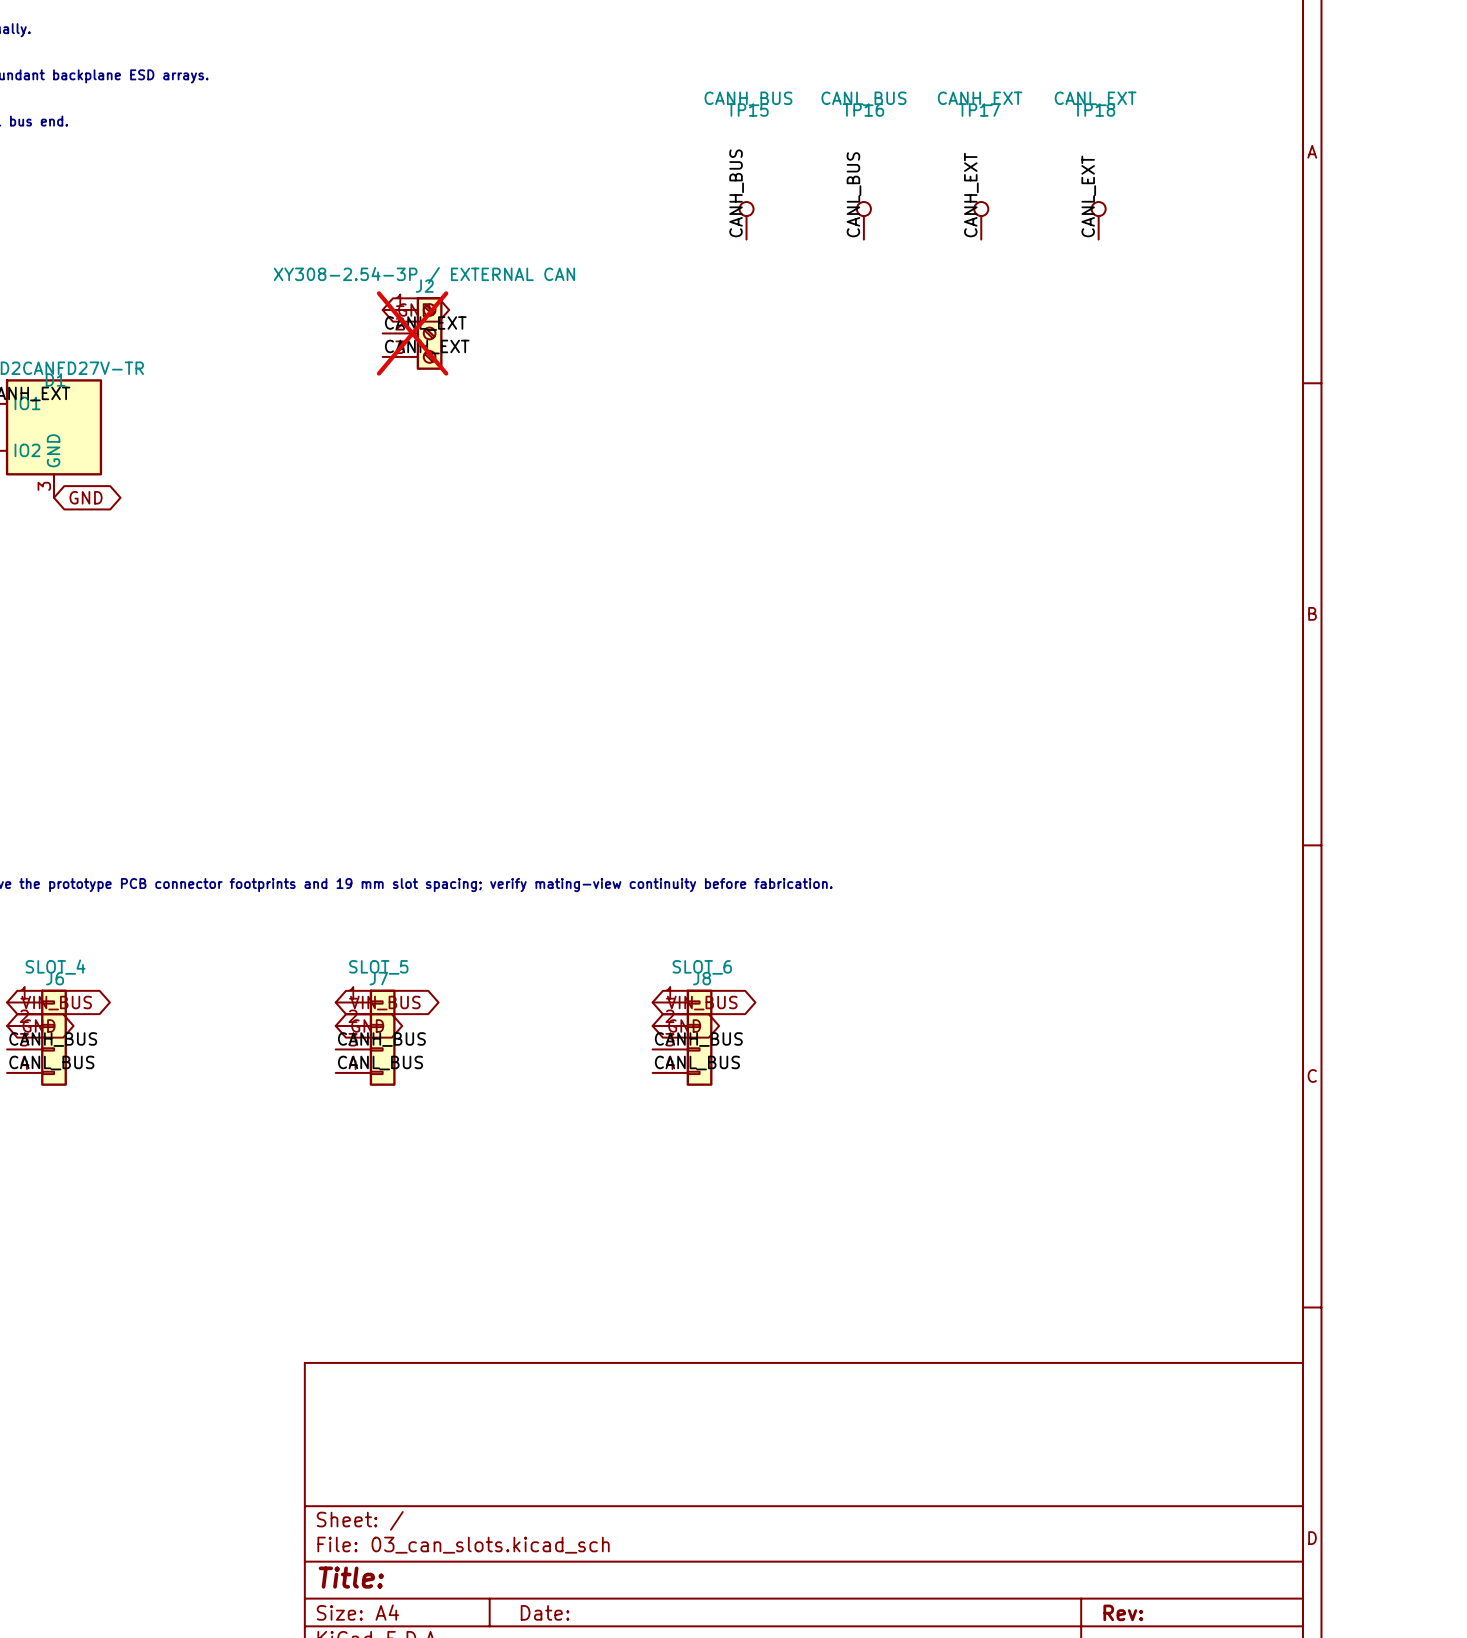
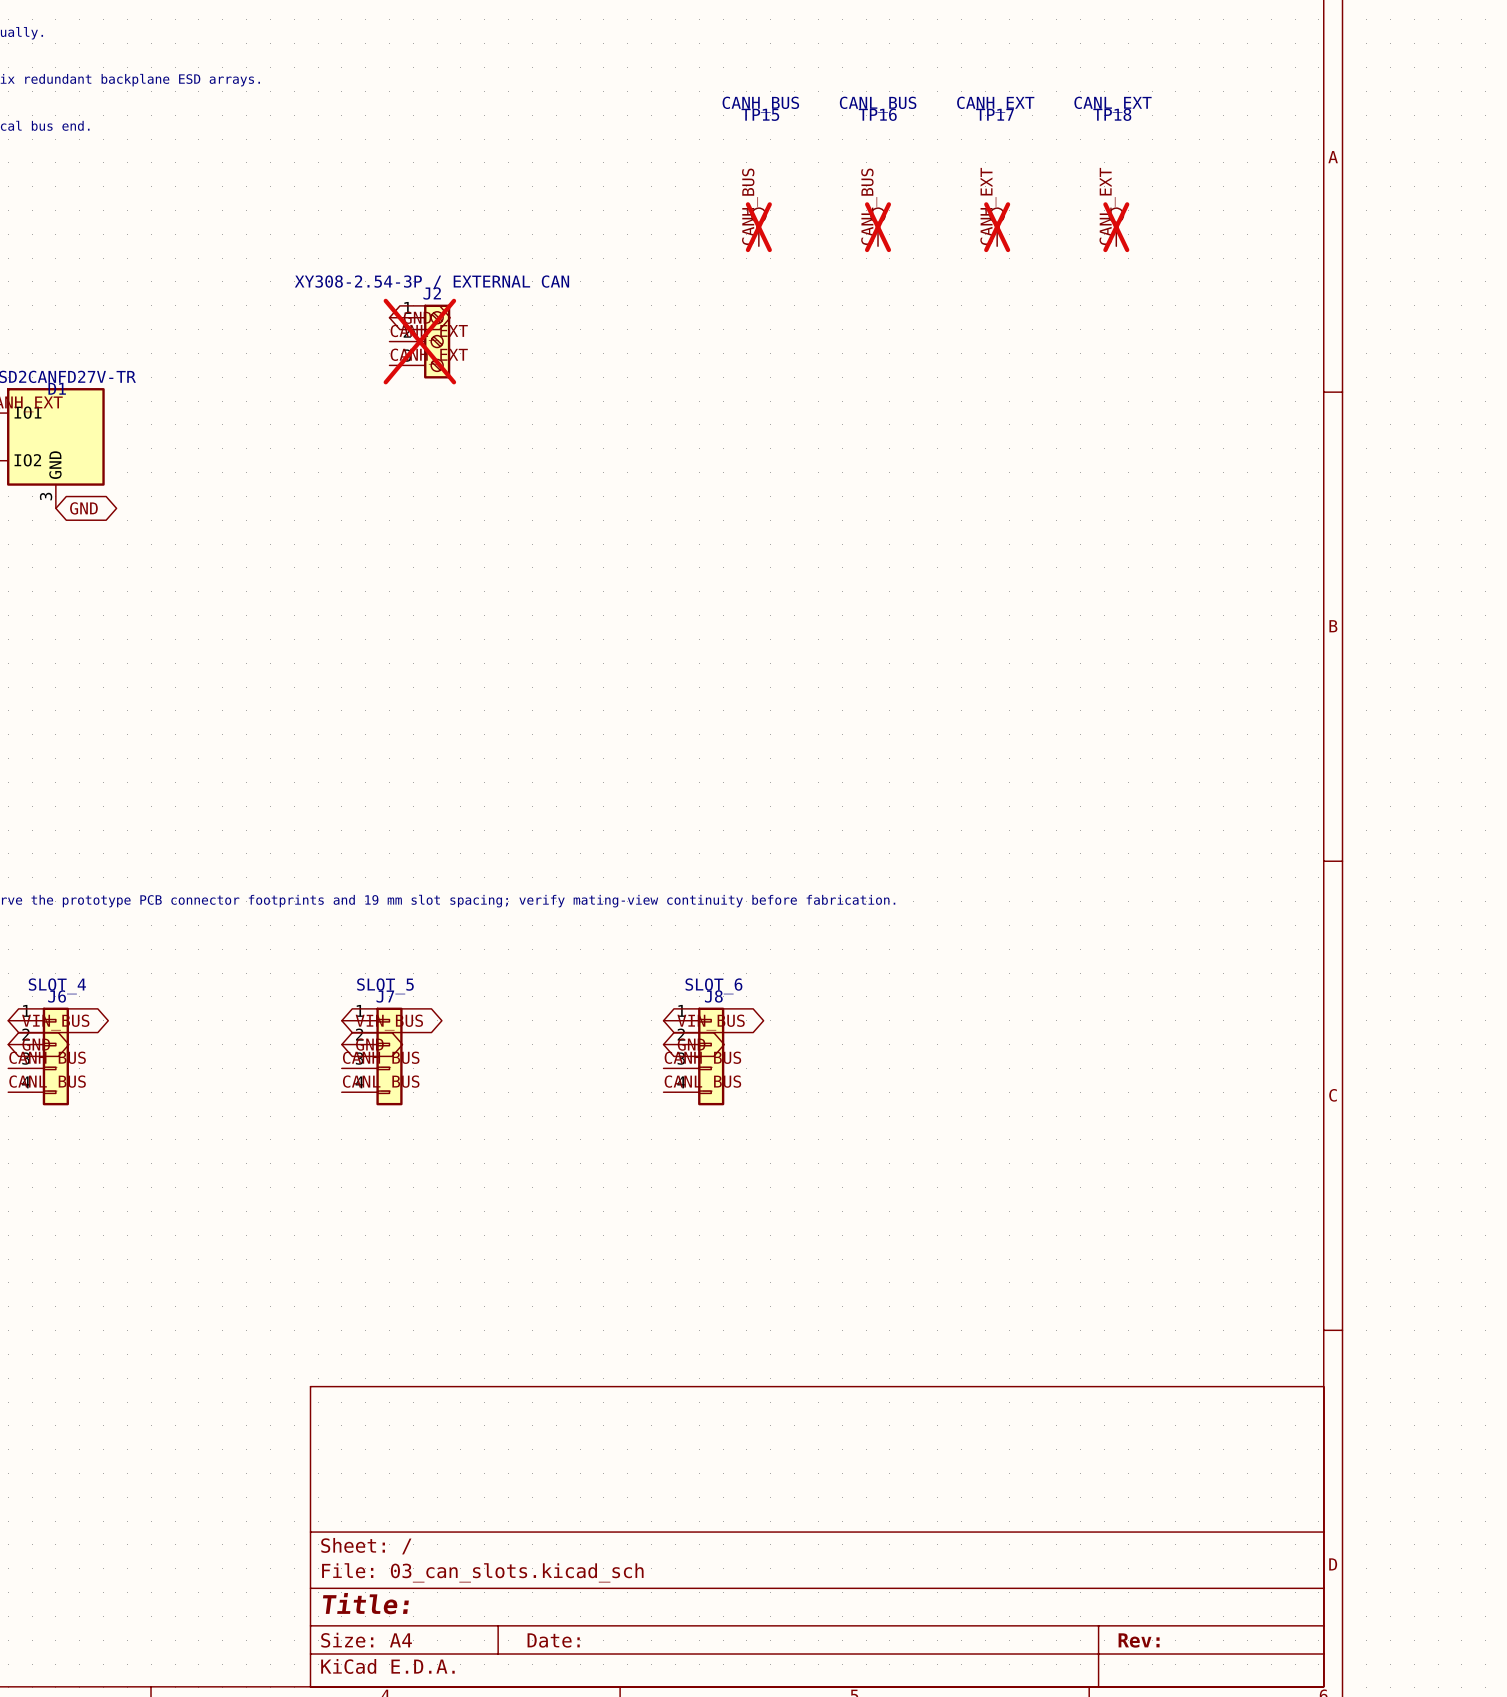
TP15 do-not-place cross: none -> (758, 227)
TP16 do-not-place cross: none -> (878, 227)
TP17 do-not-place cross: none -> (997, 227)
TP18 do-not-place cross: none -> (1116, 227)

